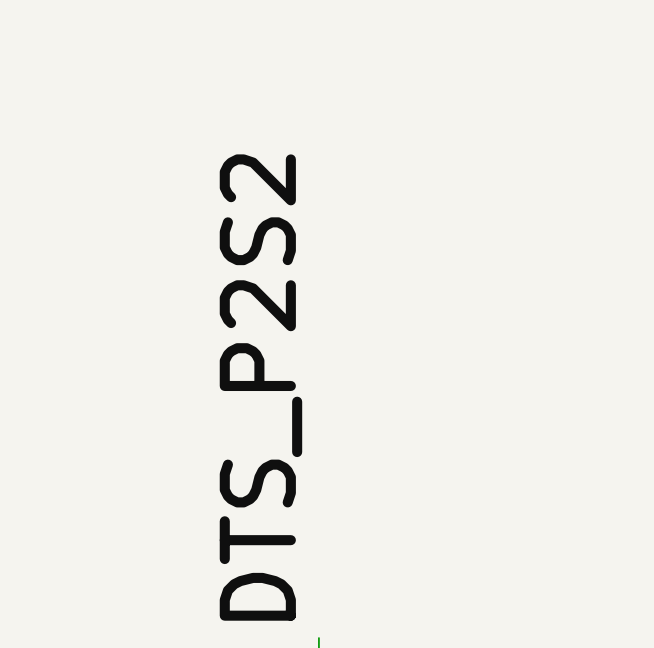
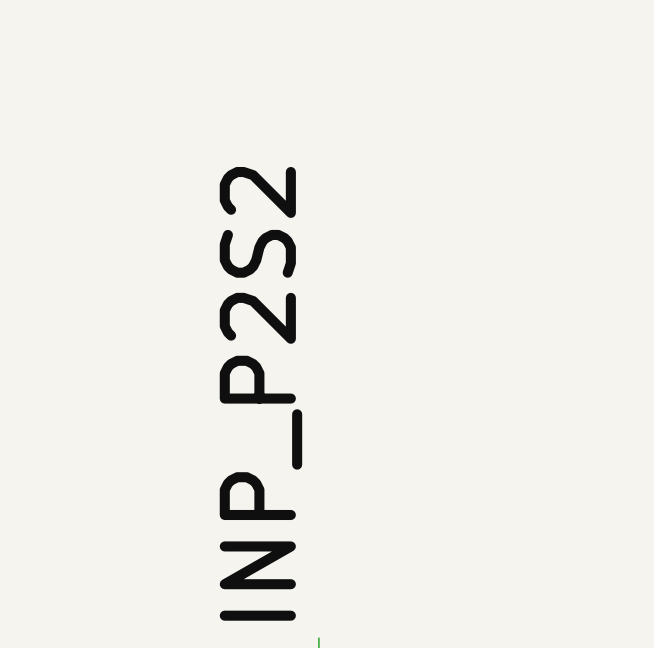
label: DTS_P2S2 (260, 387) -> INP_P2S2 (260, 393)

